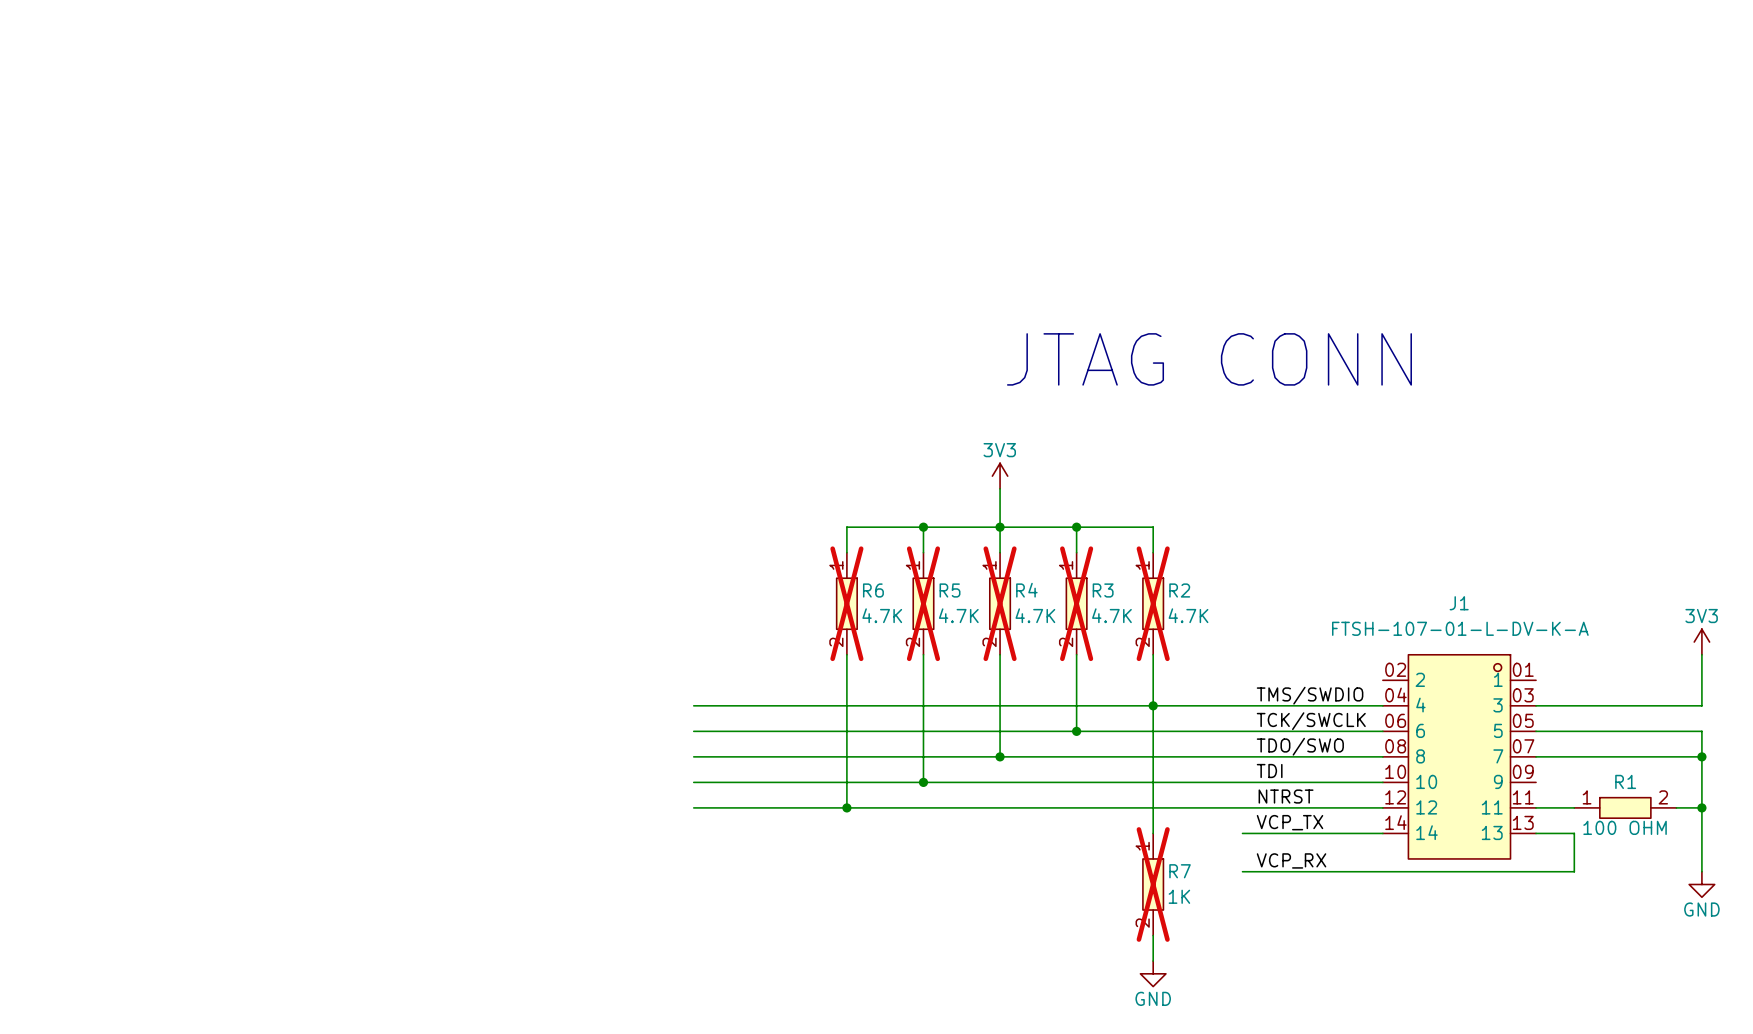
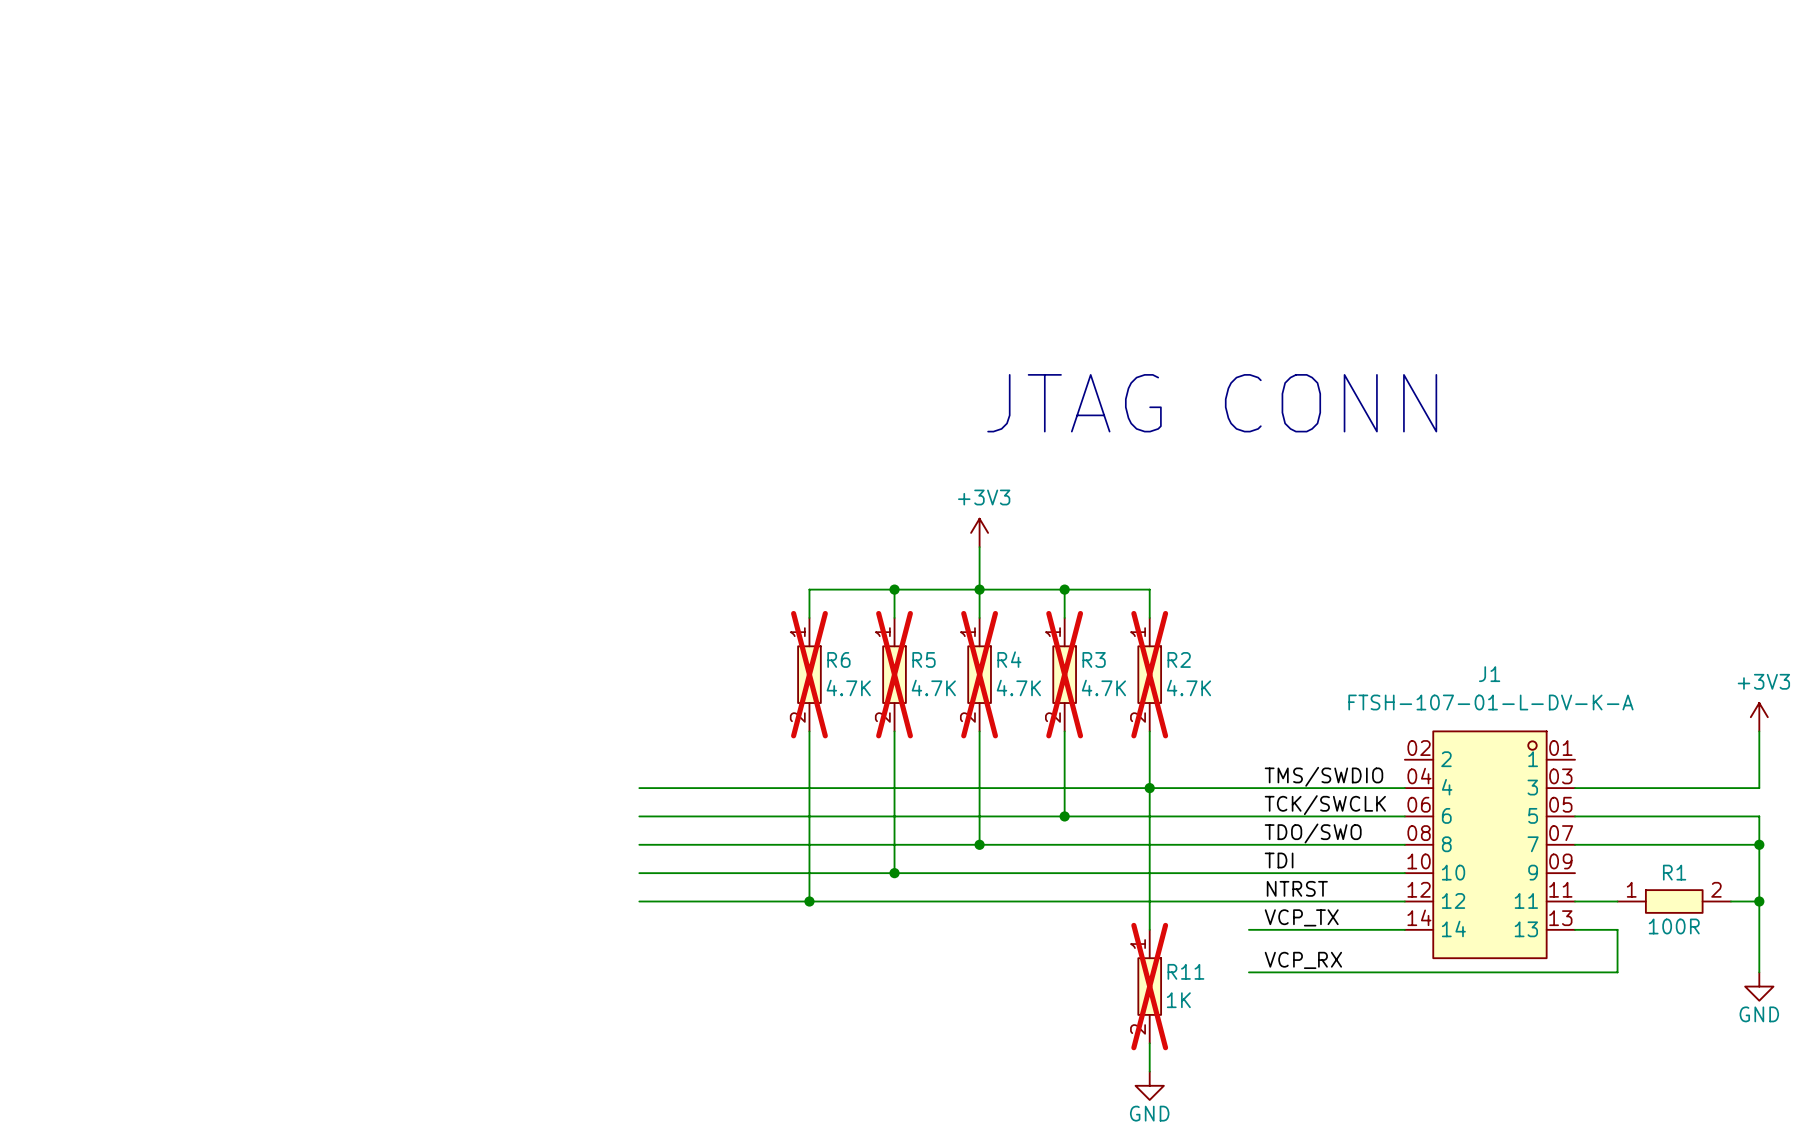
power symbol: 3V3 (1000, 476) -> +3V3 (979, 532)
power symbol: 3V3 (1701, 642) -> +3V3 (1759, 717)
R1 text: 100 OHM (1625, 827) -> 100R (1674, 926)
R7 name: R7 (1180, 871) -> R11 (1185, 971)

